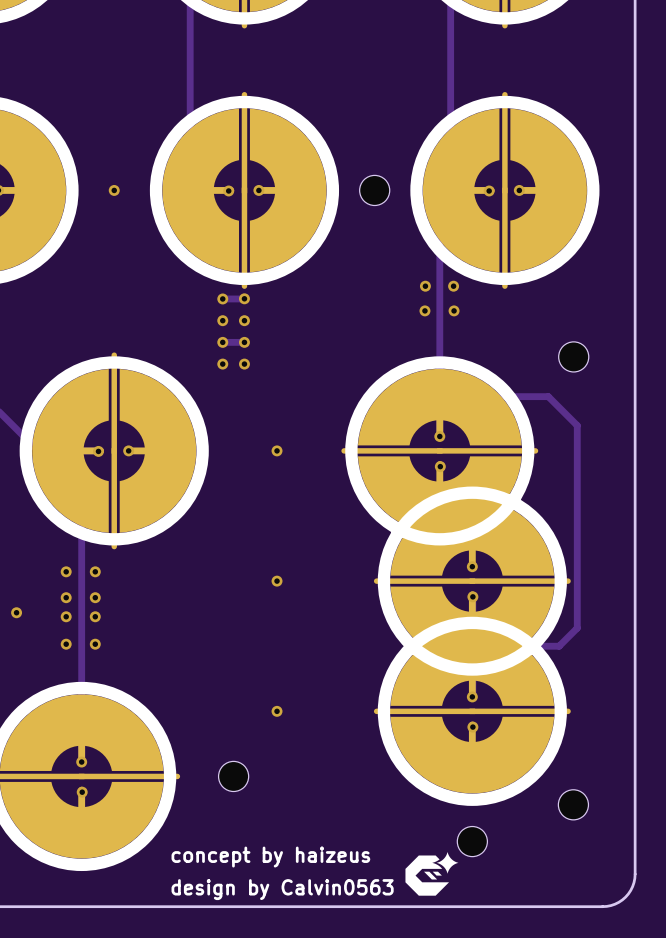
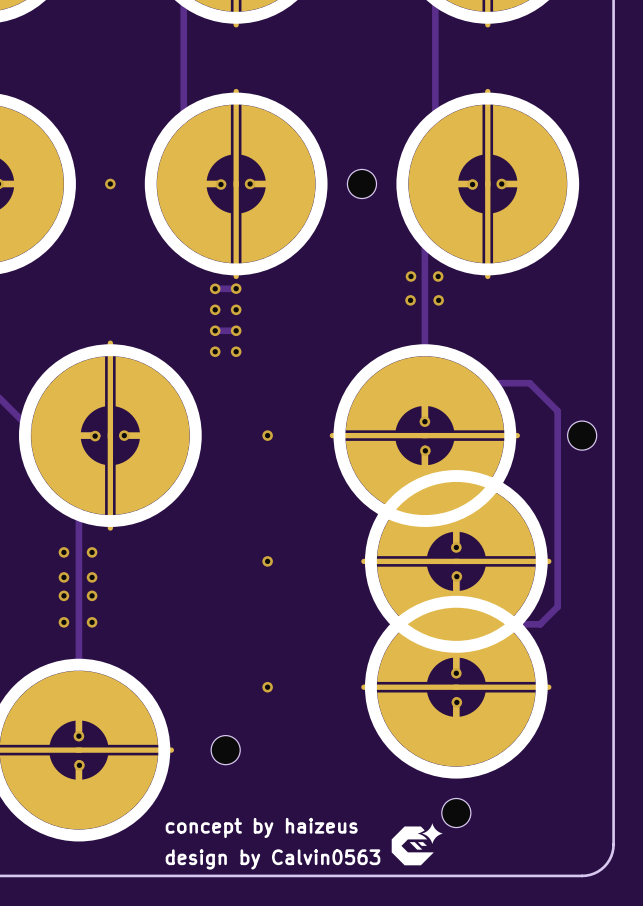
part position: (573, 356) -> (582, 435)
via: (16, 612) -> none
part: (573, 804) -> none

